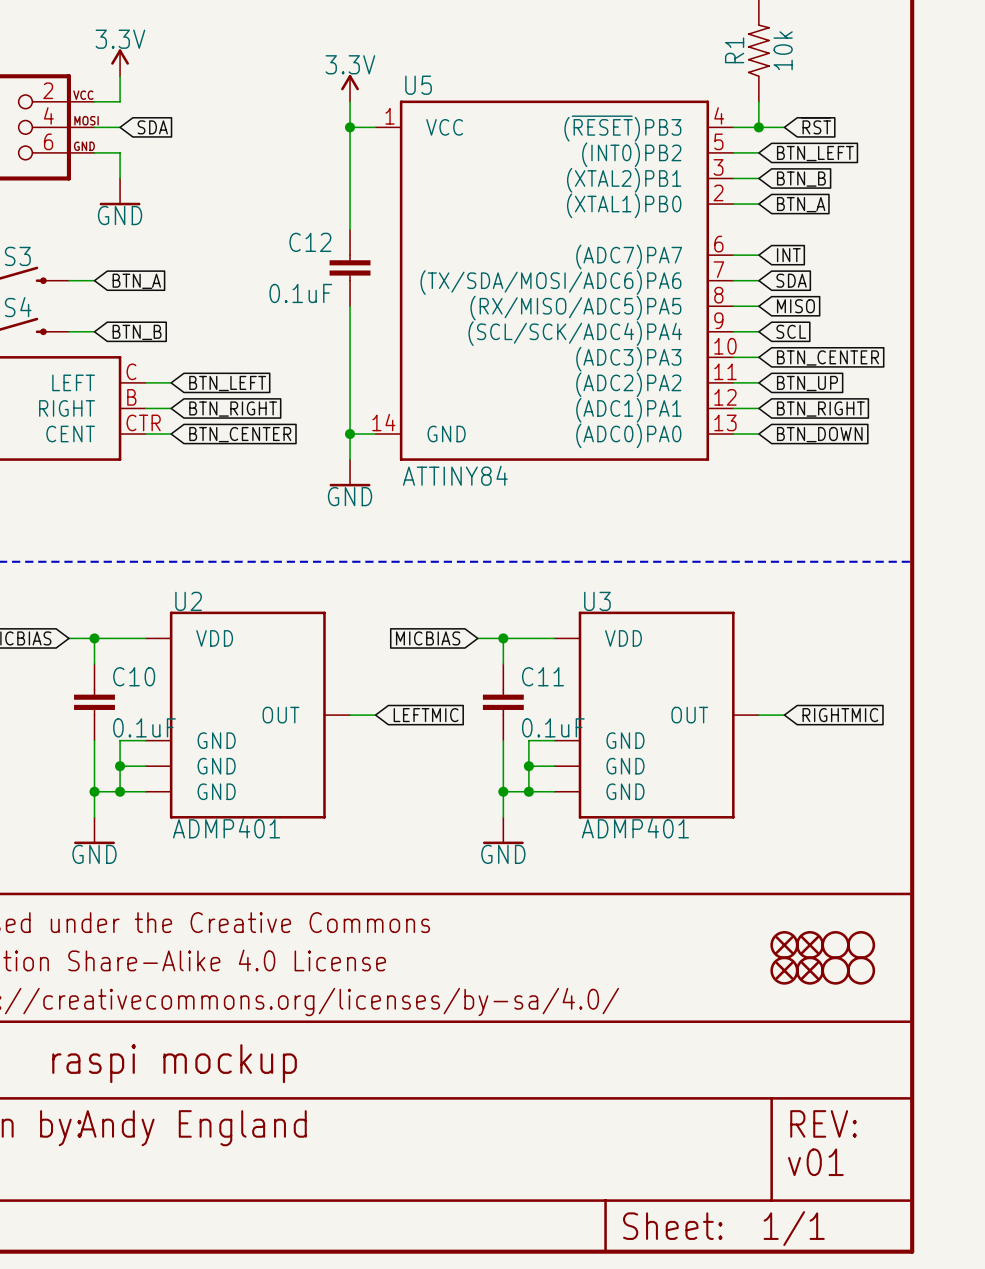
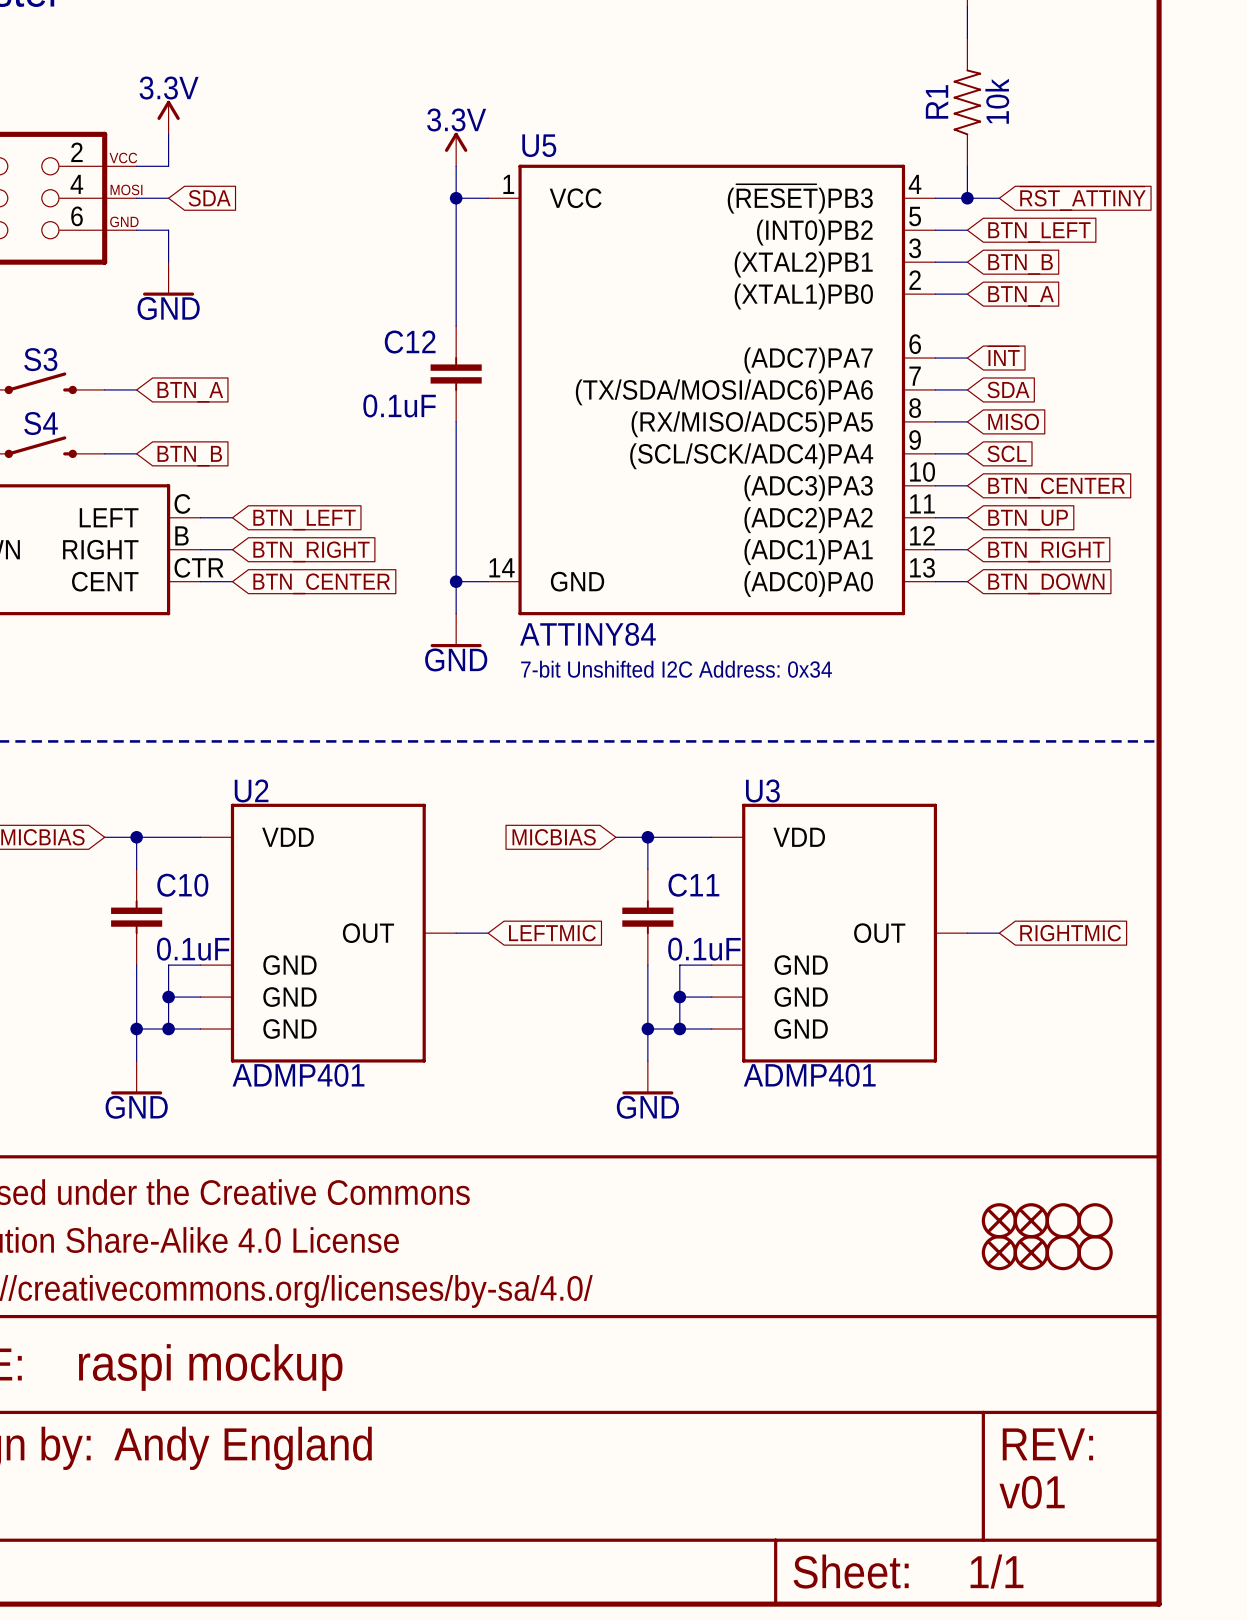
global label: ~{RST} (816, 125) -> ~{RST_ATTINY} (1082, 198)
global label: INT (788, 255) -> ~{INT} (1003, 356)
text: none -> 7-bit Unshifted I2C Address: 0x34 (676, 669)

